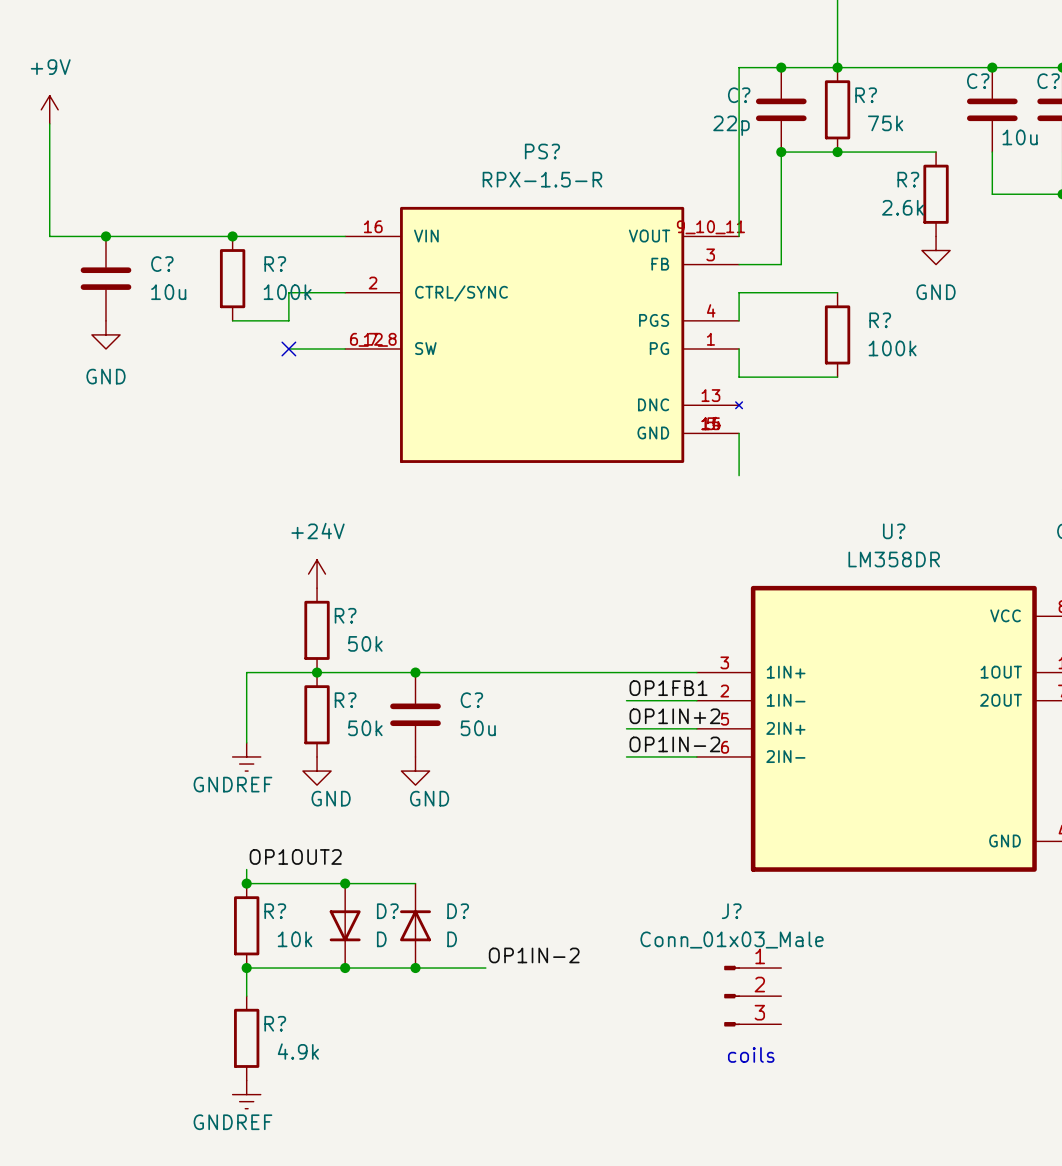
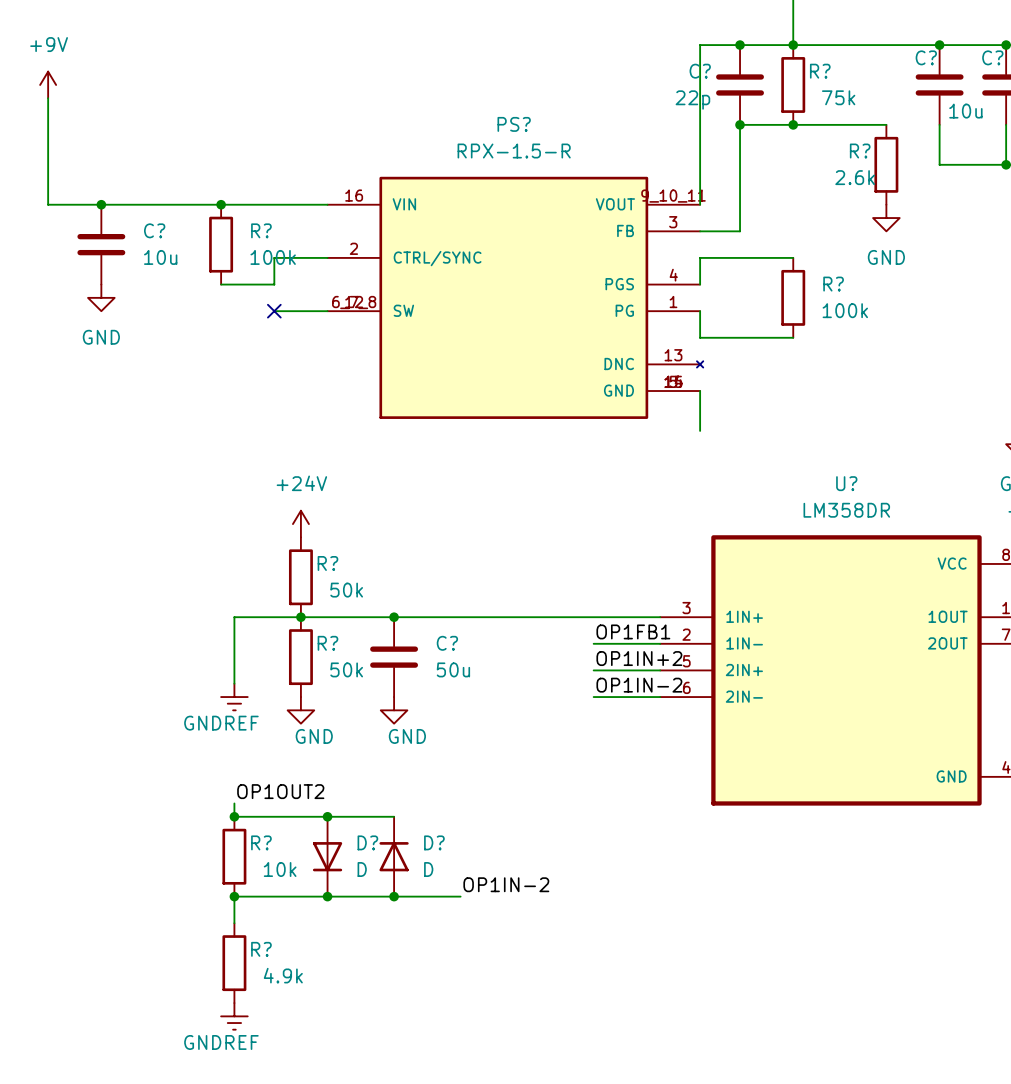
J?: Conn_01x03_Male (752, 996) -> none
text: coils (751, 1054) -> none

